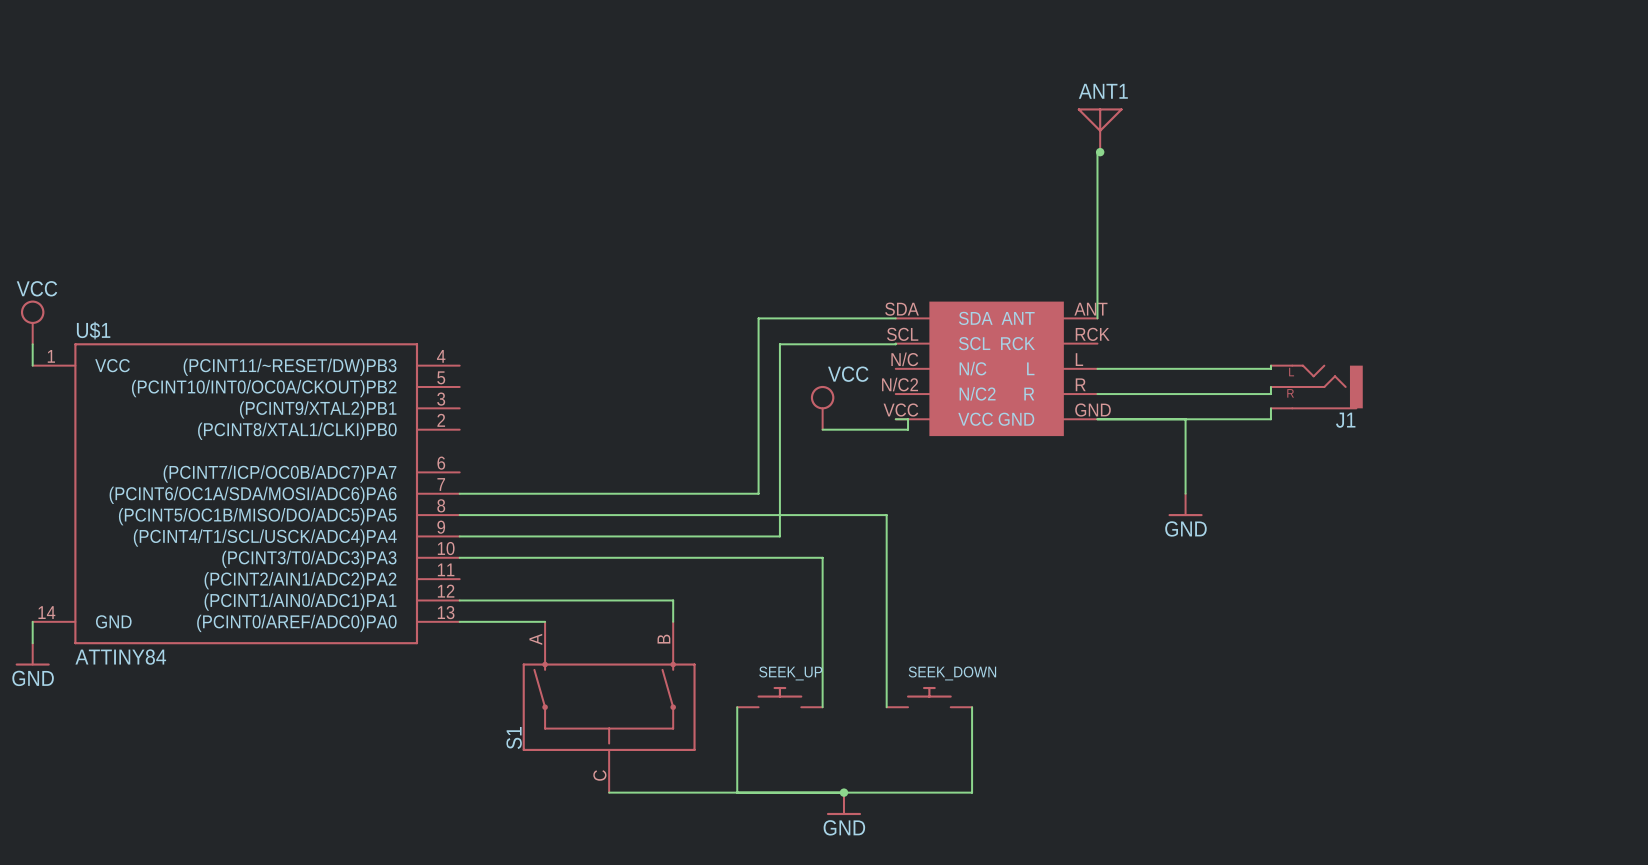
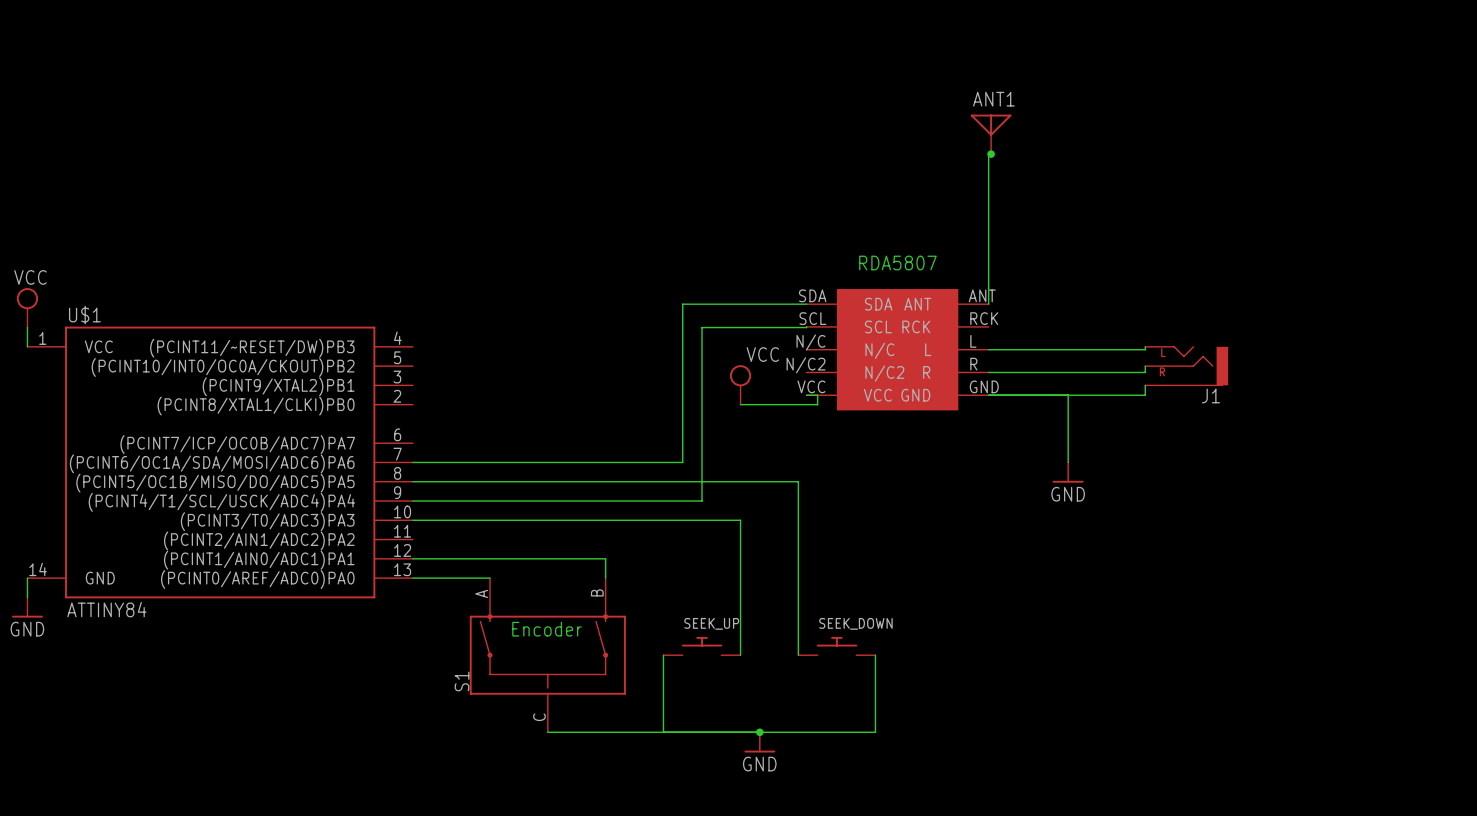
text: none -> RDA5807 (897, 263)
text: none -> Encoder (546, 629)

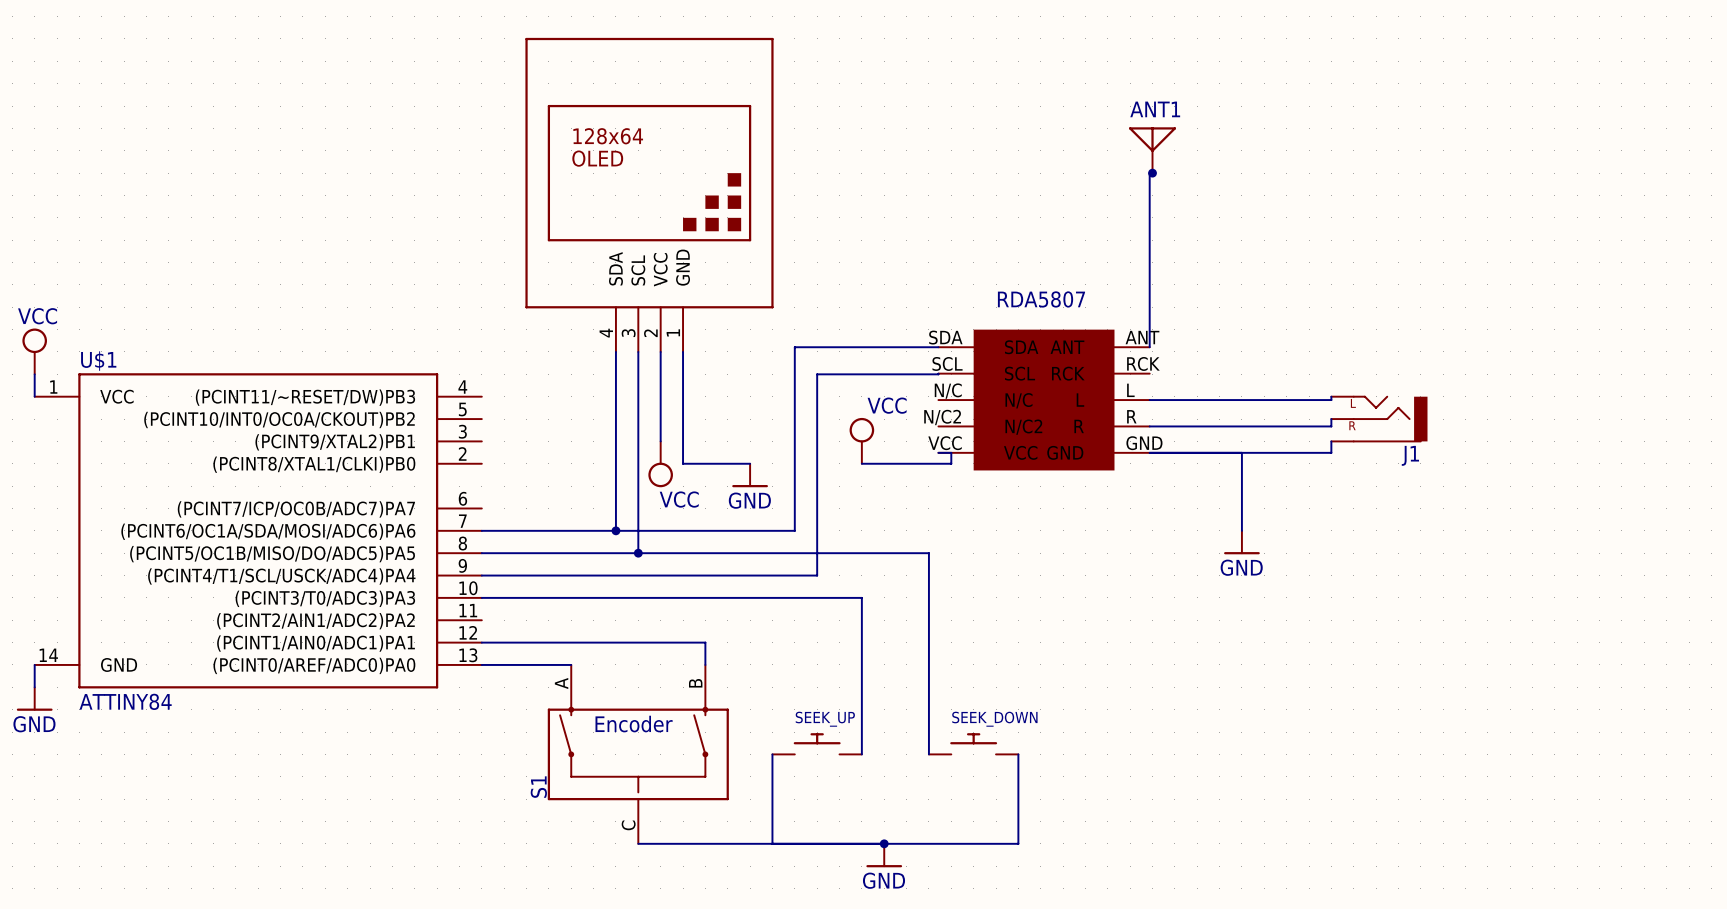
part: none -> (649, 194)
wire: none -> (615, 351) (615, 530)
wire: none -> (638, 351) (638, 553)
wire: none -> (660, 351) (660, 441)
wire: none -> (683, 351) (683, 463) (750, 463)
power symbol: none -> VCC (660, 464)
power symbol: none -> GND (750, 475)
junction: none -> (615, 530)
junction: none -> (638, 553)

